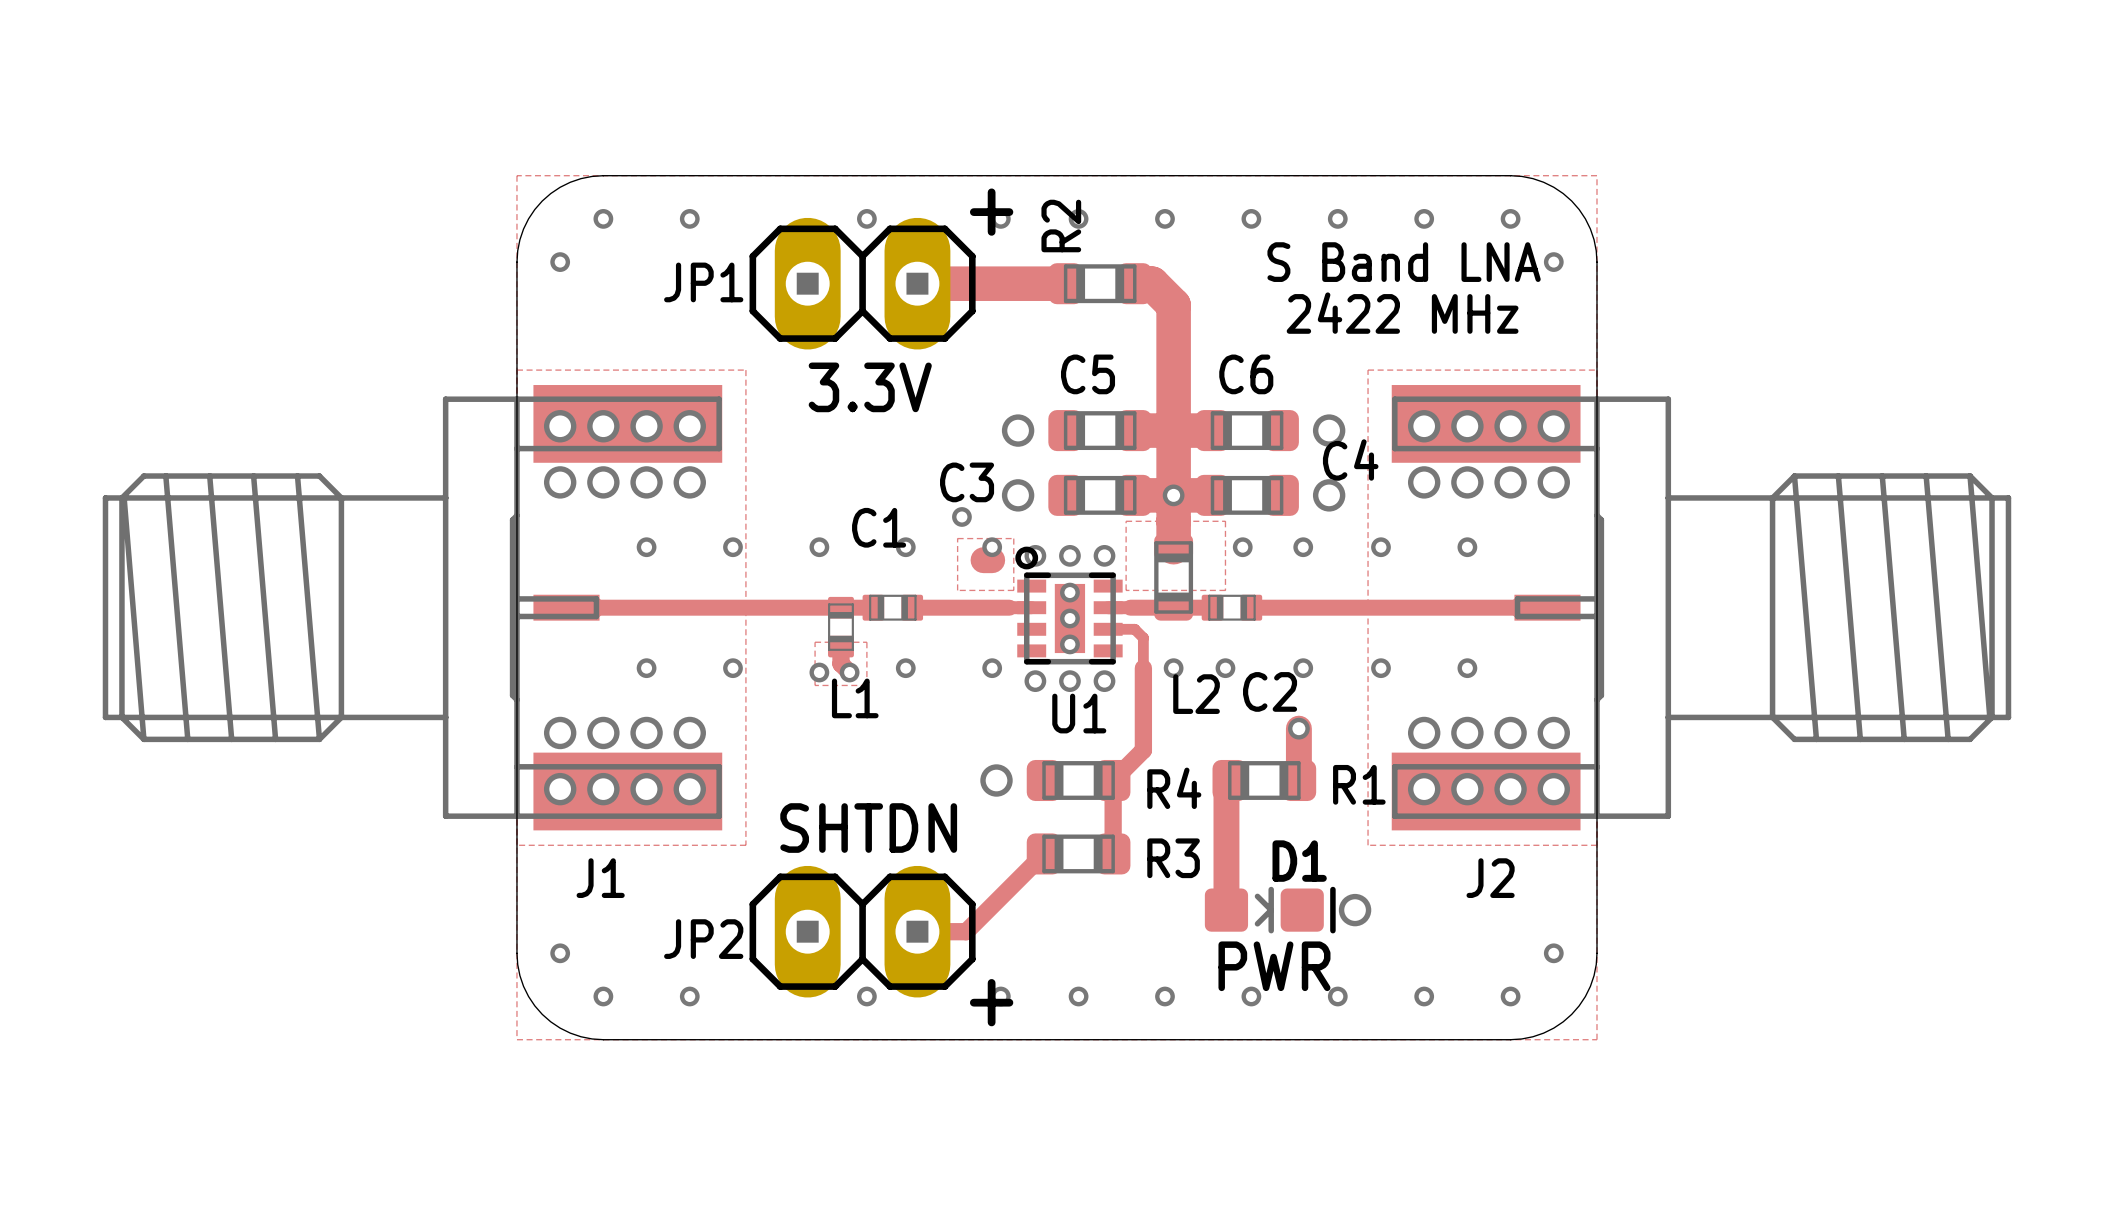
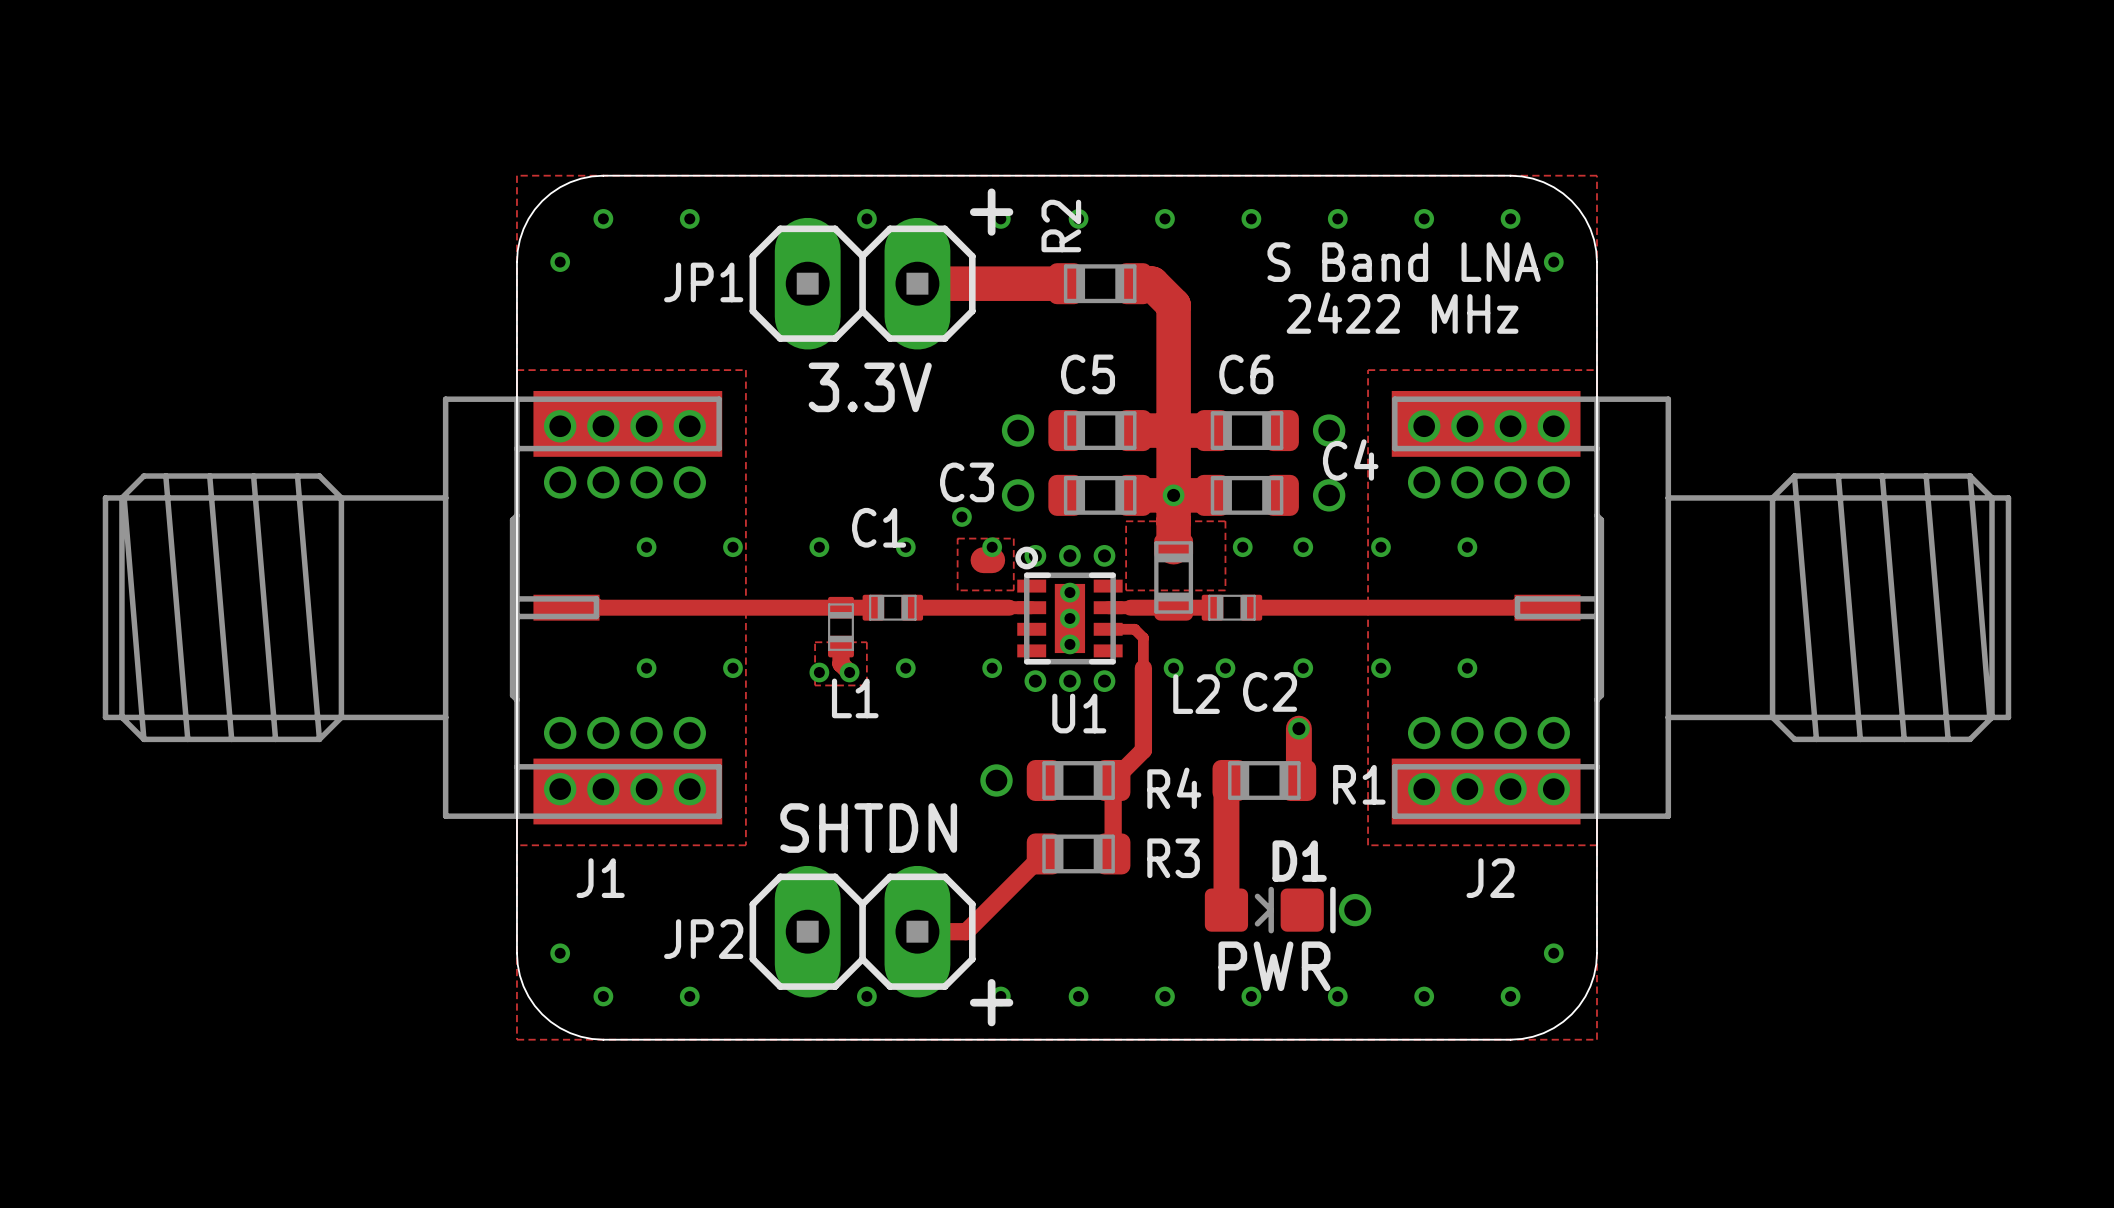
J1 footprint: [102, 385, 723, 831] -> [102, 390, 723, 825]
J2 footprint: [1391, 385, 2012, 831] -> [1391, 390, 2012, 825]

